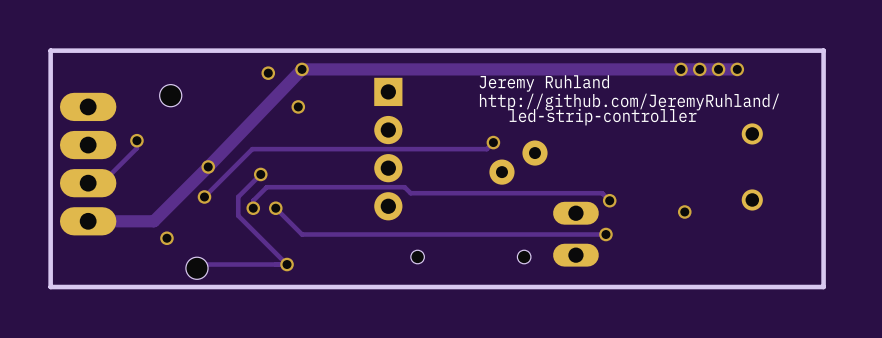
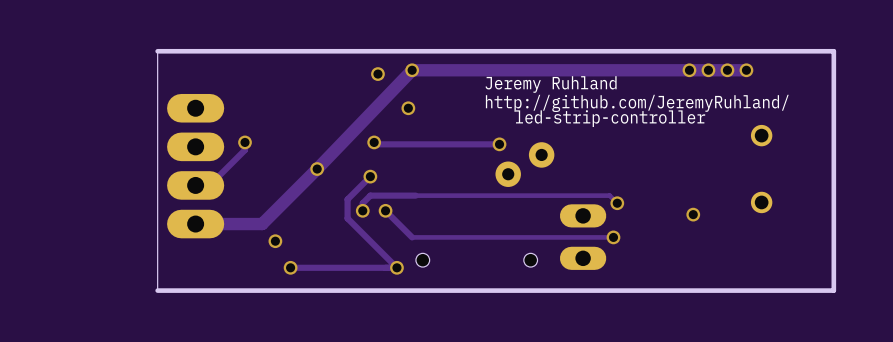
board edge: (155, 50) (50, 50) (50, 287) (155, 287) -> (157, 51) (157, 290)
via: (302, 69) -> none
track: (407, 69) (302, 69) (153, 221) (88, 221) -> (412, 70) (262, 224) (195, 224)
via: none -> (412, 70)
via: (268, 73) -> none
via: none -> (377, 74)
part: (170, 95) -> none
via: (298, 106) -> none
via: none -> (408, 108)
track: (136, 140) (136, 148) (101, 183) (88, 183) -> (245, 142) (245, 150) (209, 185) (195, 185)
via: (136, 140) -> none
via: none -> (245, 142)
via: none -> (374, 142)
track: (493, 142) (486, 149) (252, 149) (204, 196) -> (499, 144) (376, 144) (374, 142)
part: (388, 149) -> none
part position: (88, 164) -> (195, 166)
via: (208, 166) -> none
via: none -> (317, 169)
track: (260, 174) (238, 196) (238, 215) (287, 264) -> (370, 176) (347, 199) (347, 218) (396, 267) (290, 267)
via: (260, 174) -> none
via: none -> (370, 176)
track: (410, 193) (404, 187) (266, 187) (253, 200) (253, 208) -> (415, 195) (370, 195) (362, 203) (362, 210)
via: (204, 196) -> none
via: (253, 208) -> none
track: (275, 208) (302, 234) (407, 234) -> (385, 210) (412, 237)
via: (275, 208) -> none
via: none -> (362, 210)
via: none -> (385, 210)
via: (166, 238) -> none
via: none -> (275, 241)
track: (283, 264) (200, 264) (196, 268) -> none
via: none -> (396, 267)
part: (196, 268) -> none

